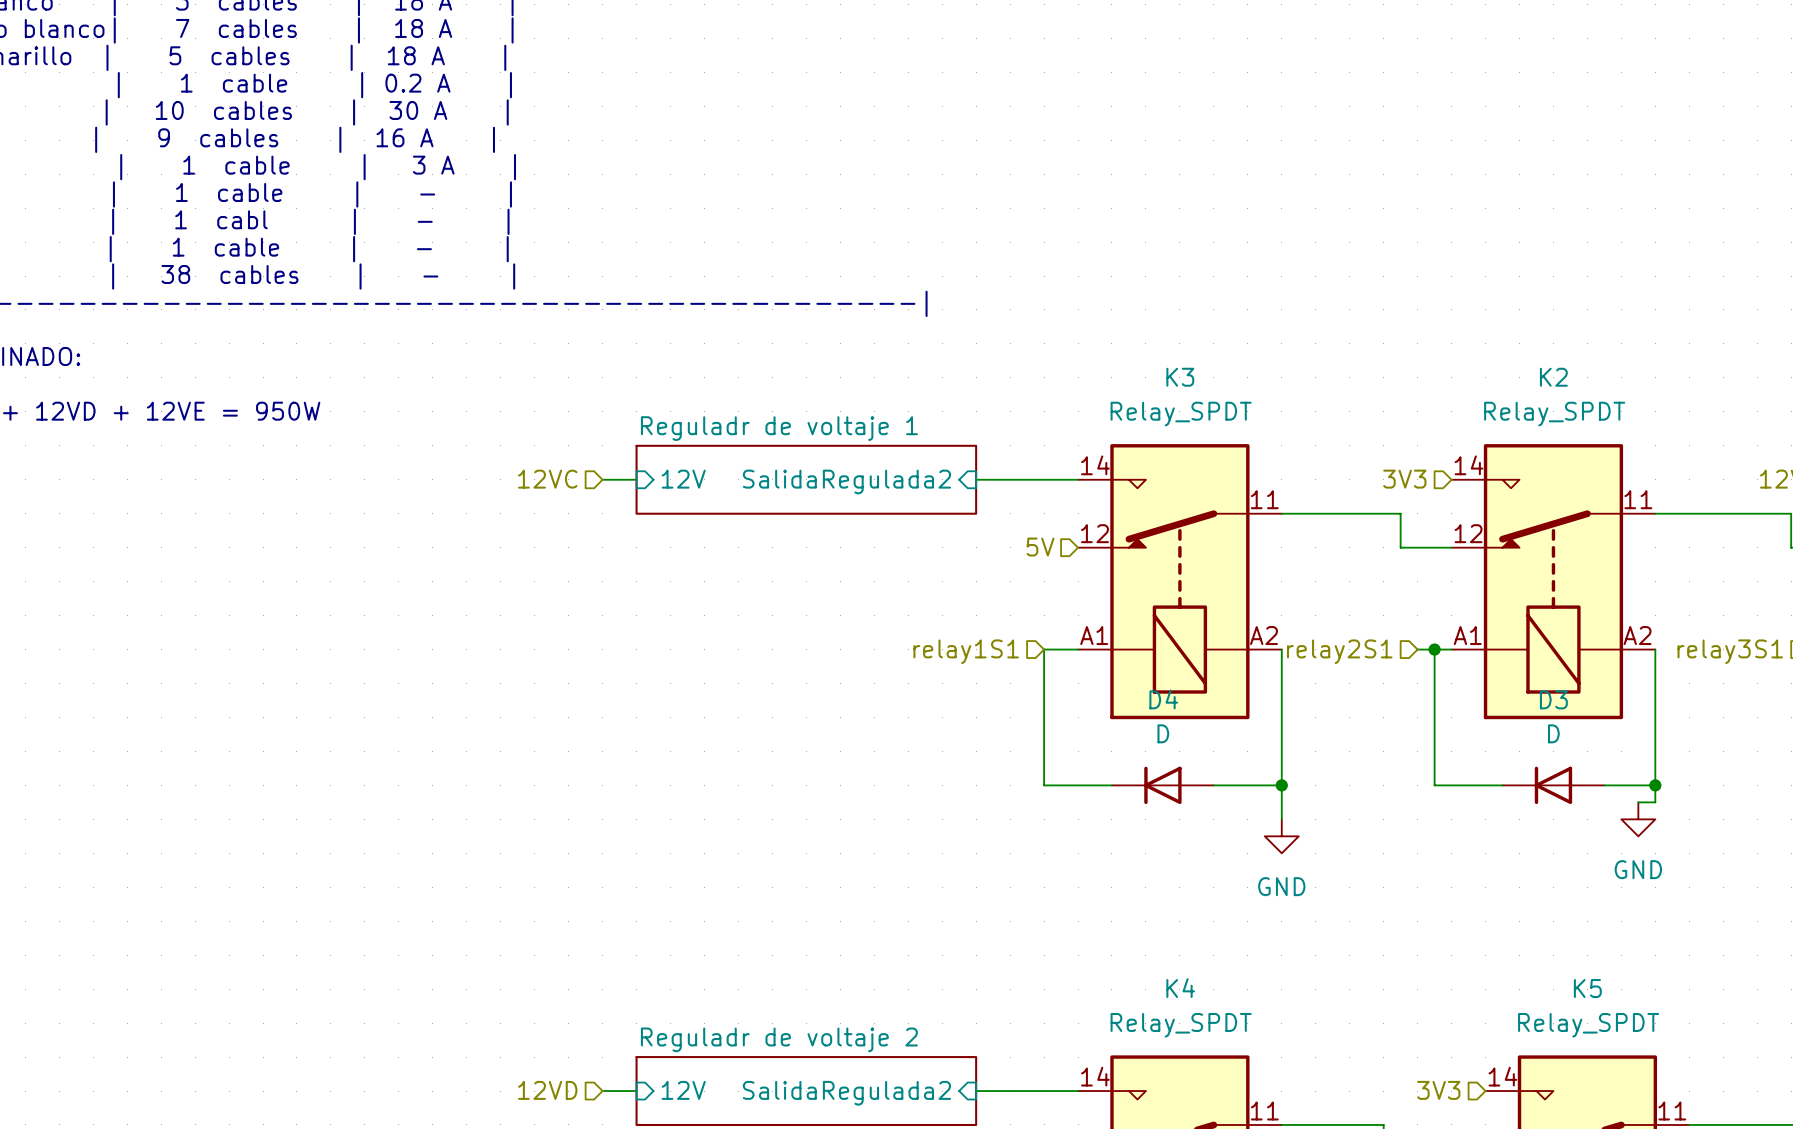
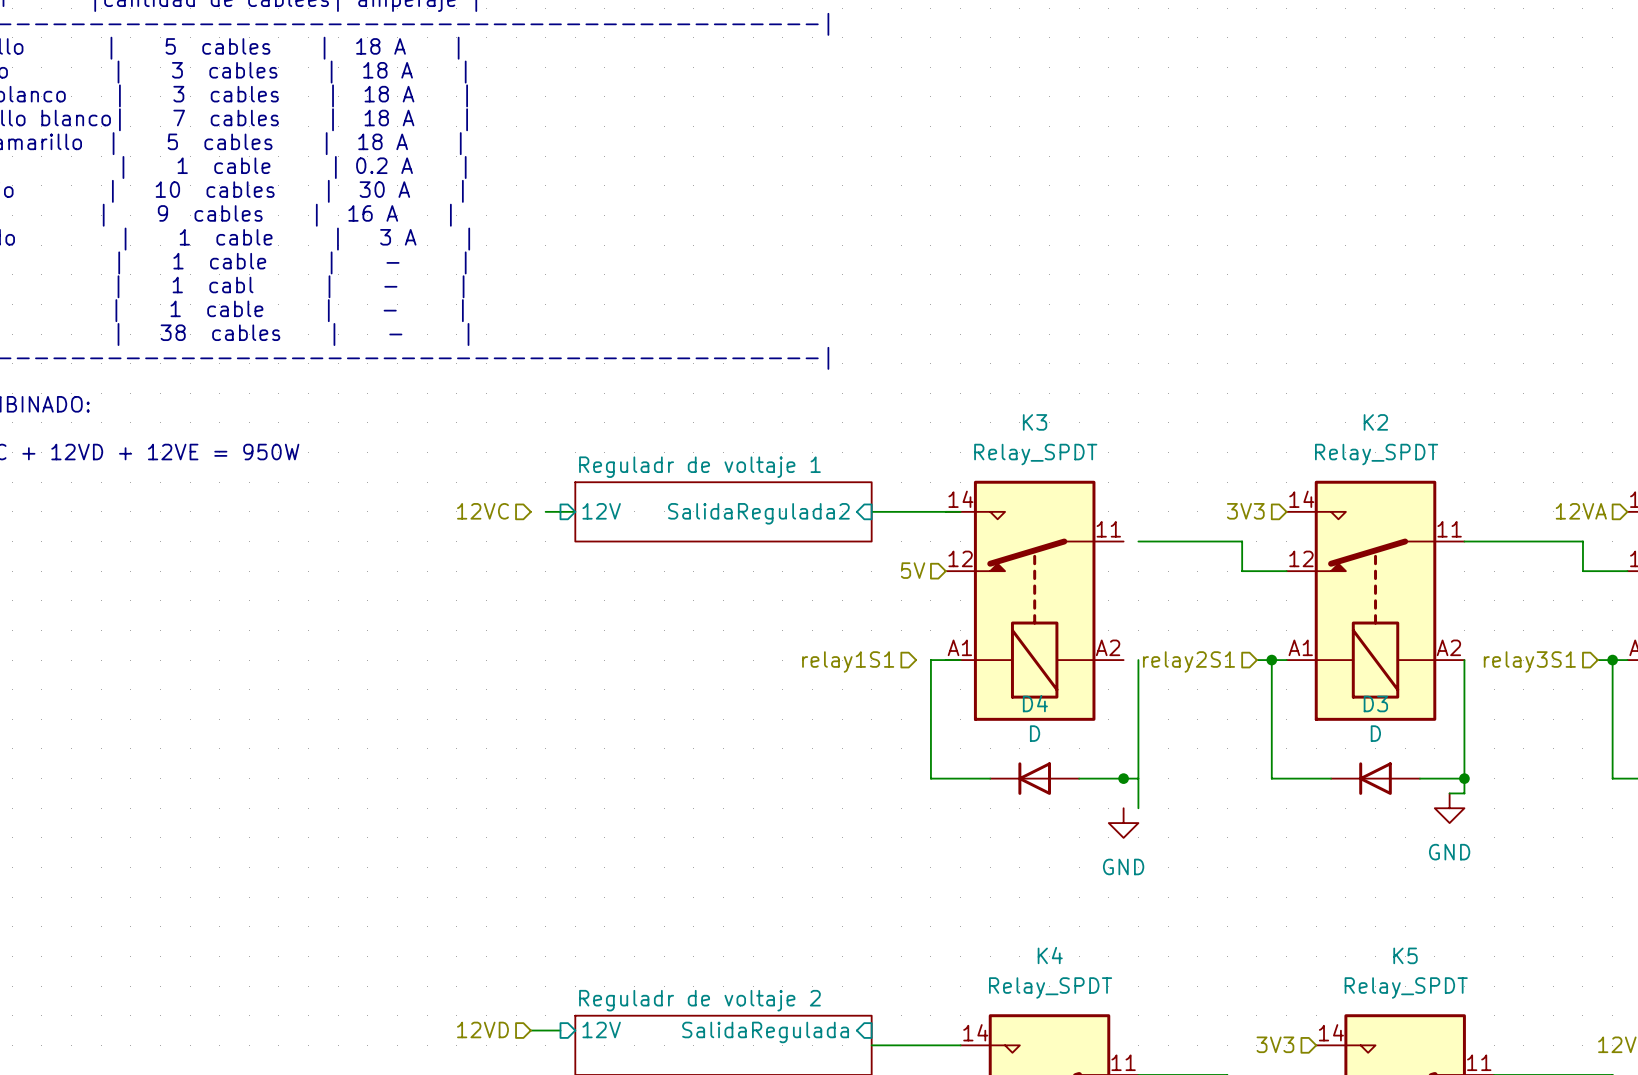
hierarchical label position: 12VC (547, 479) -> 12VC (482, 511)
sheet pin position: 12V (683, 479) -> 12V (601, 511)
hierarchical label position: 5V (1040, 547) -> 5V (913, 570)
K3 position: (1179, 581) -> (1034, 600)
hierarchical label position: relay1S1 (966, 651) -> relay1S1 (848, 661)
junction position: (1281, 785) -> (1123, 778)
power symbol position: GND (1281, 836) -> GND (1123, 823)
hierarchical label position: 12VD (547, 1090) -> 12VD (482, 1029)
sheet pin position: 12V (683, 1090) -> 12V (601, 1029)
wire: (602, 1091) (636, 1091) -> (530, 1030) (560, 1030)
sheet pin: SalidaRegulada2 (846, 1093) -> SalidaRegulada (765, 1032)

